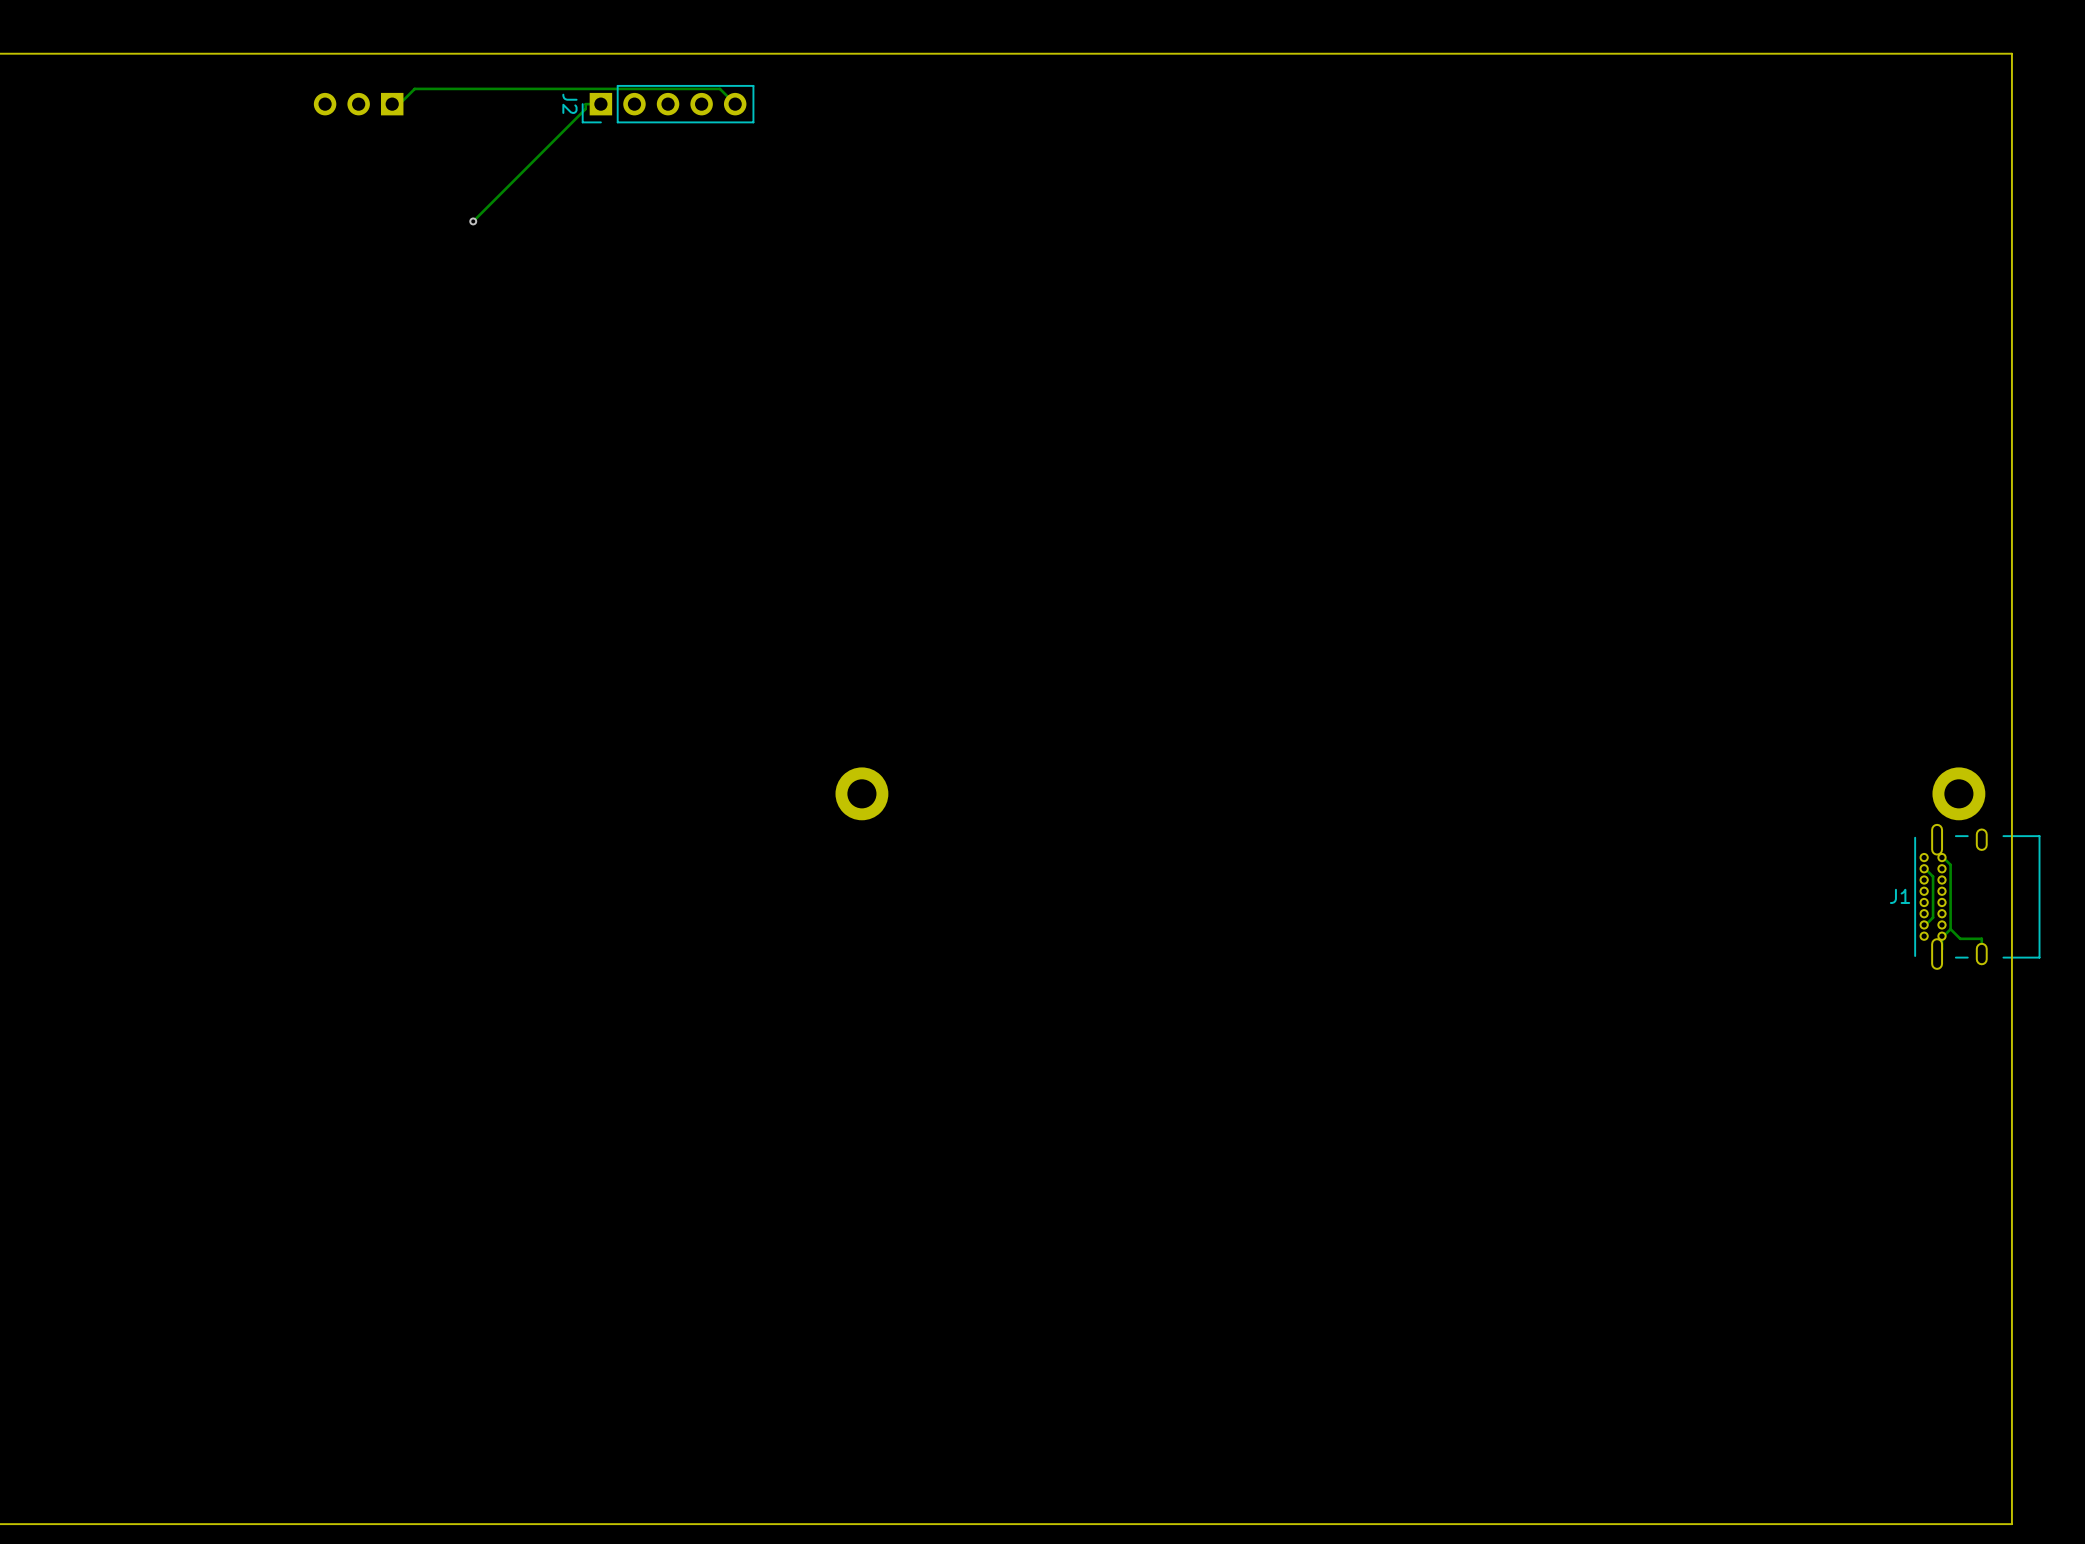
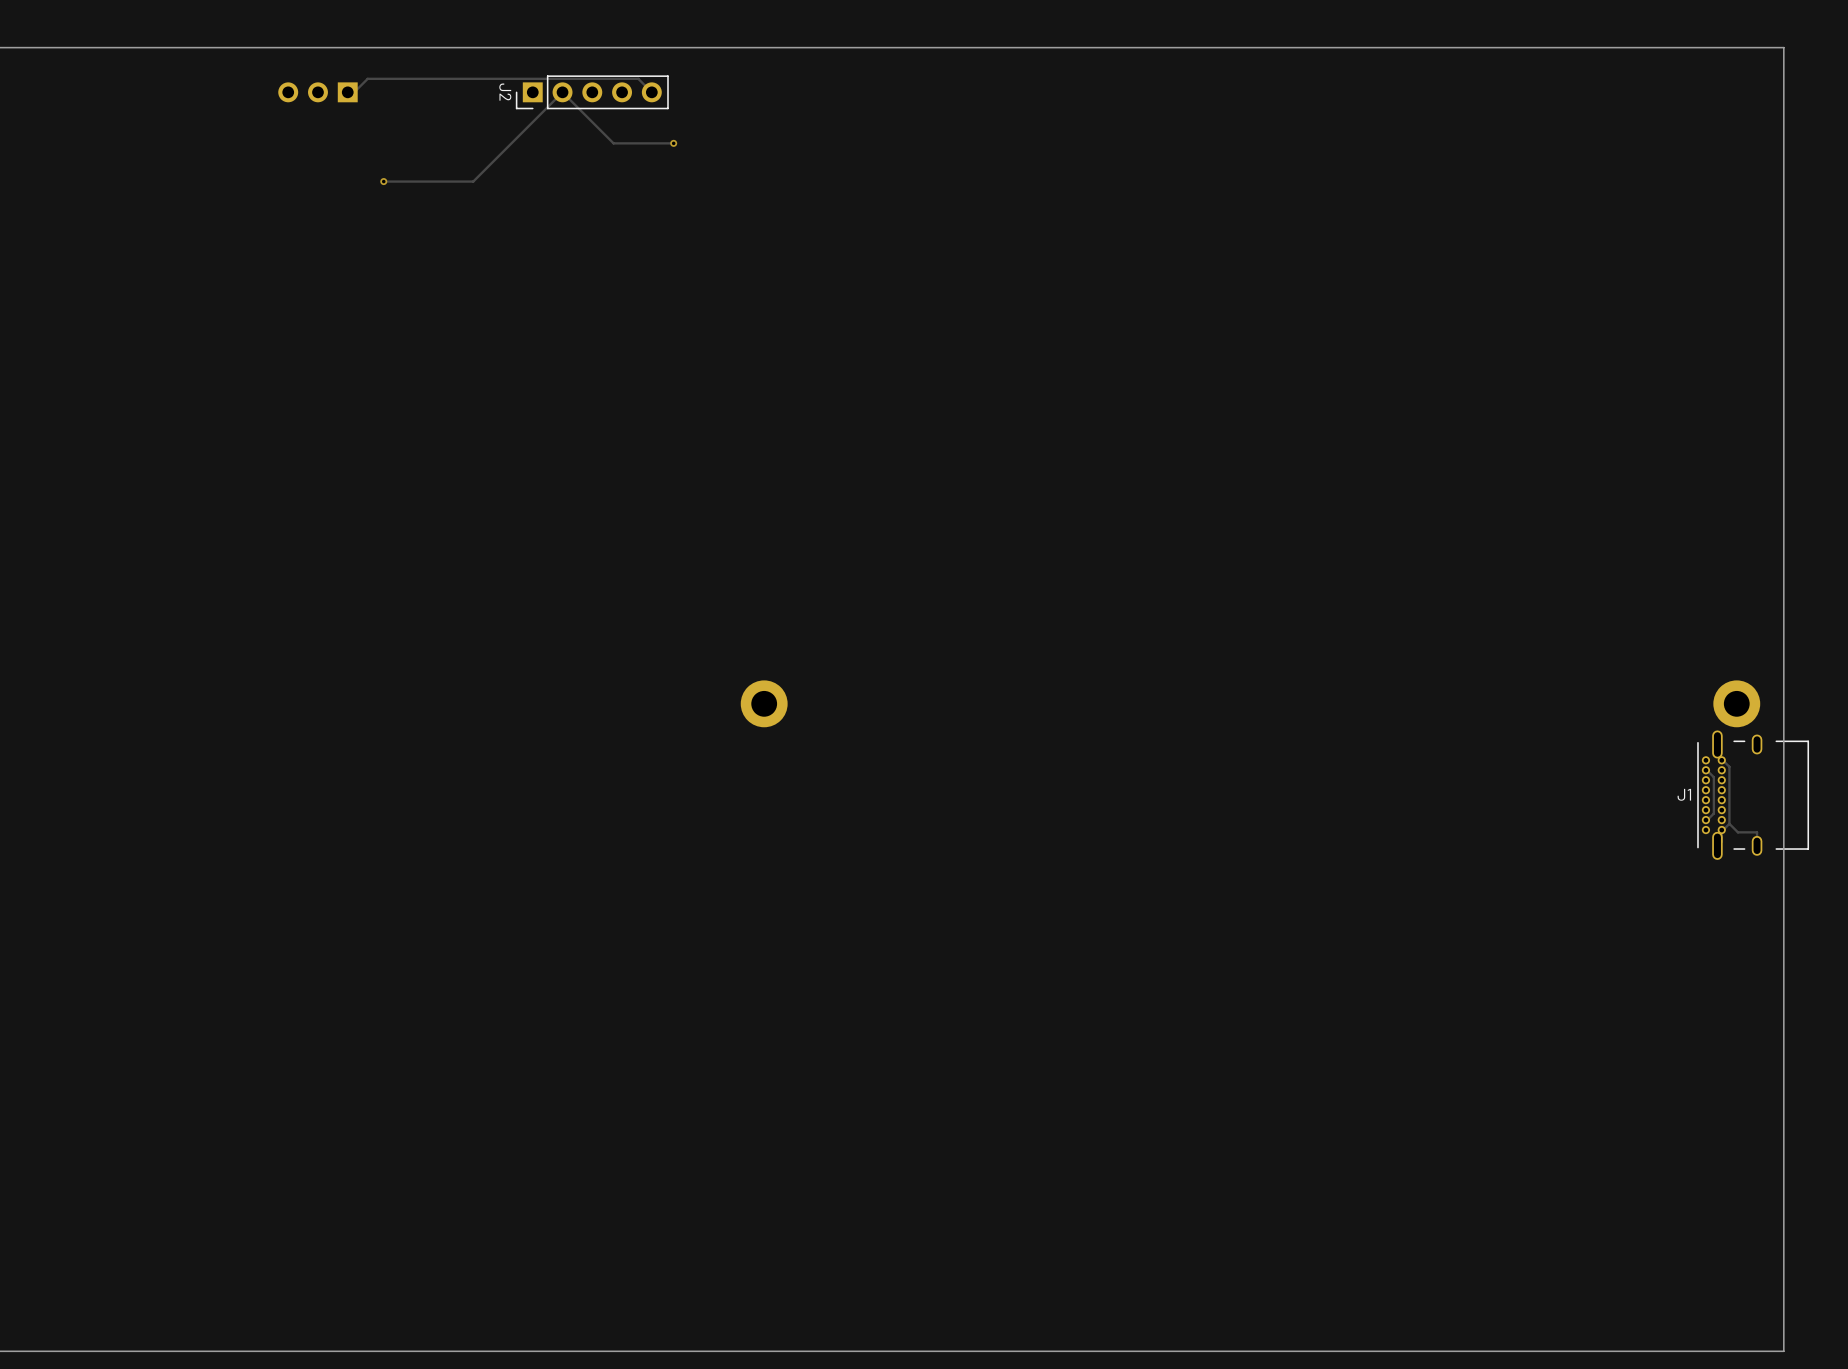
track: (600, 104) (585, 104) (585, 108) (473, 221) -> none
track: none -> (673, 143) (613, 143) (562, 92) (473, 181) (383, 181)
via: none -> (673, 143)
via position: (473, 221) -> (383, 181)

